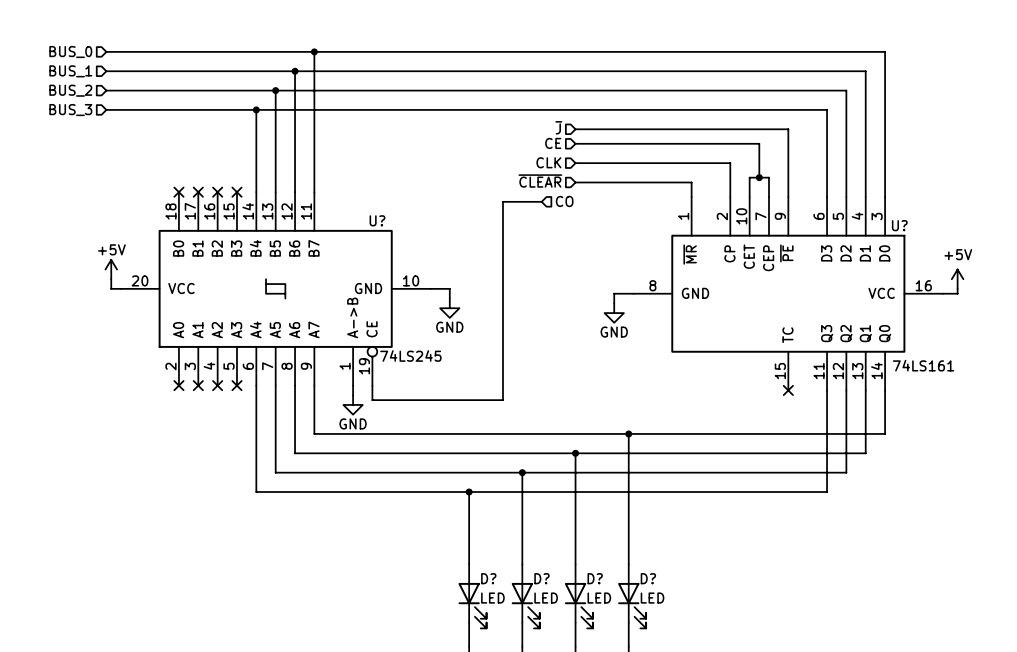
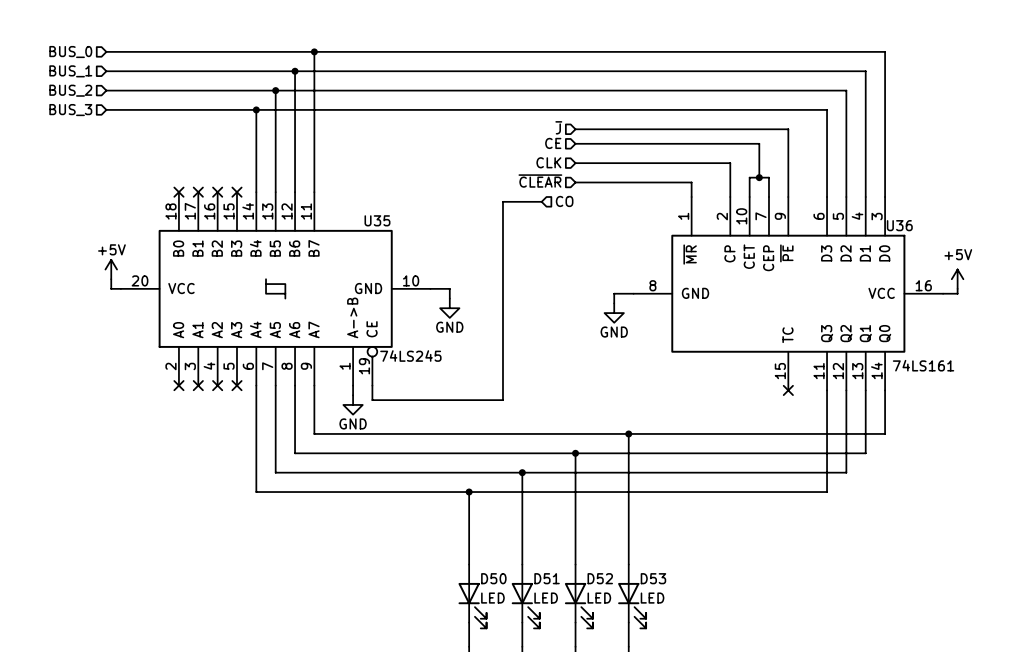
U? name: U? (377, 220) -> U35 (377, 220)
U? name: U? (899, 225) -> U36 (899, 225)
D? name: D? (488, 578) -> D50 (493, 578)
D? name: D? (541, 578) -> D51 (547, 578)
D? name: D? (595, 578) -> D52 (600, 578)
D? name: D? (648, 578) -> D53 (653, 578)

